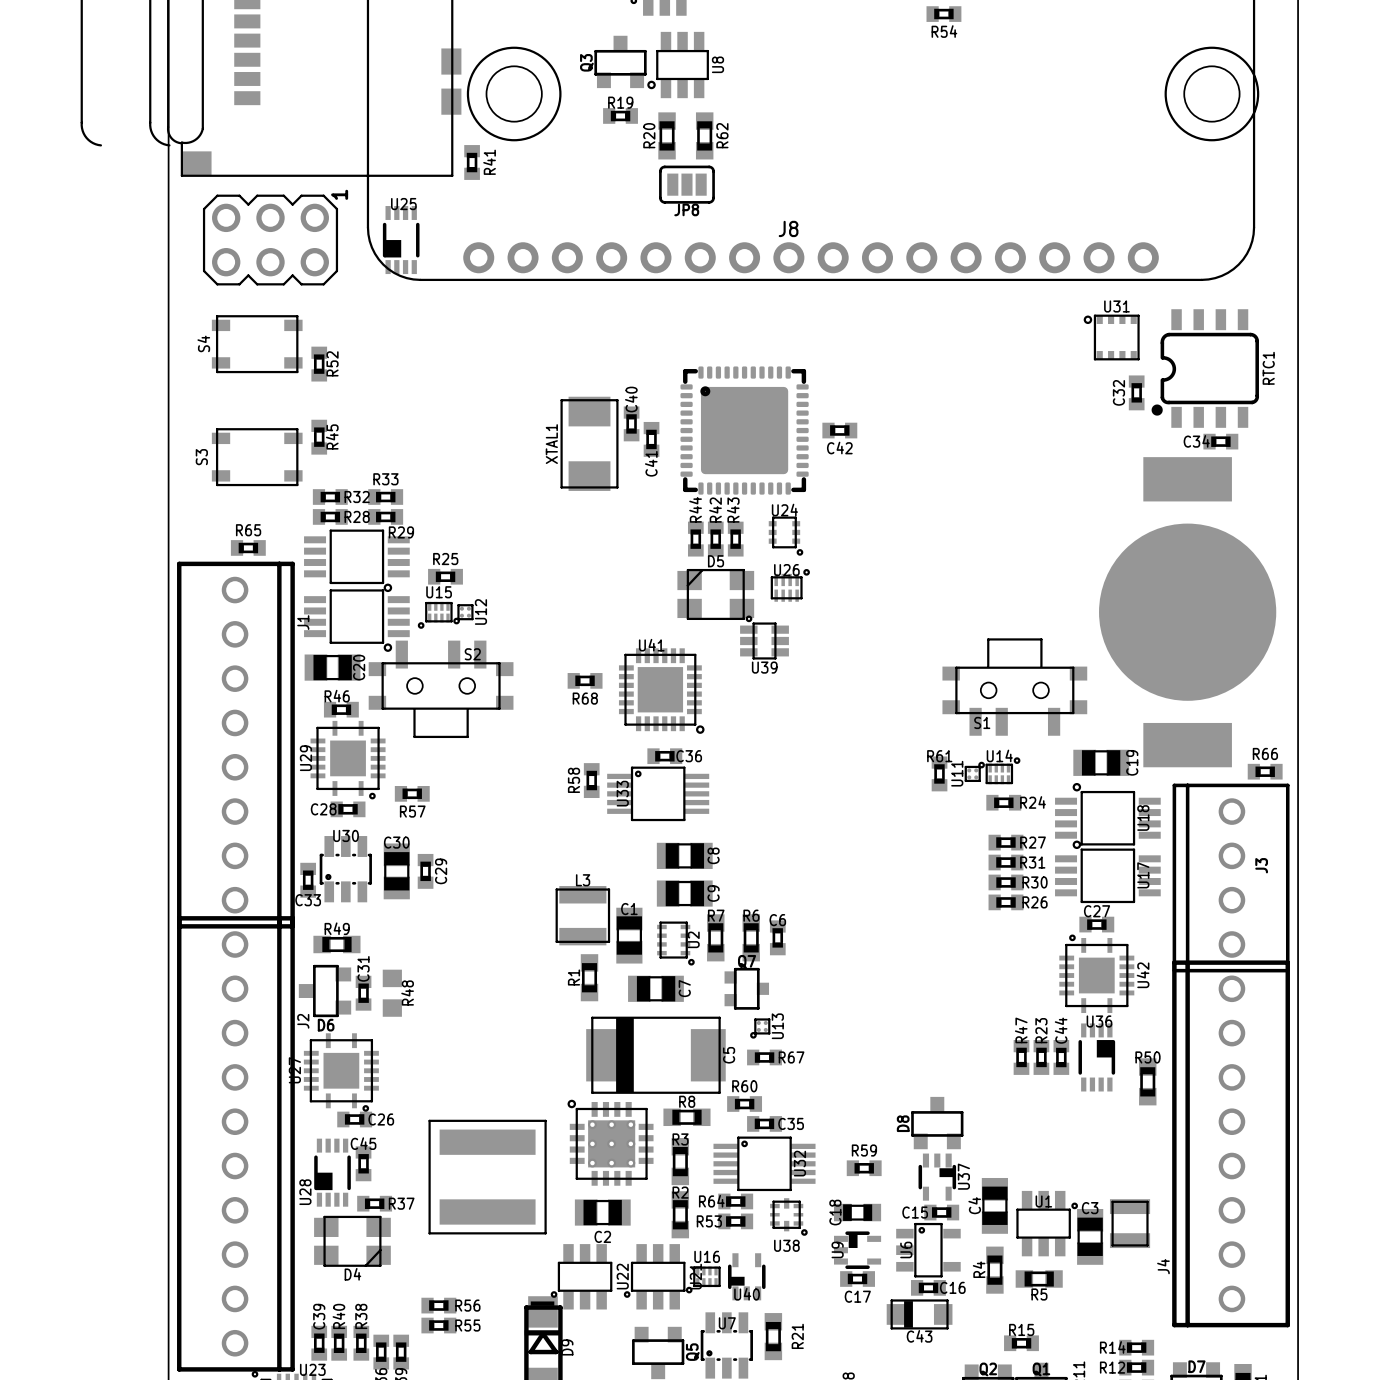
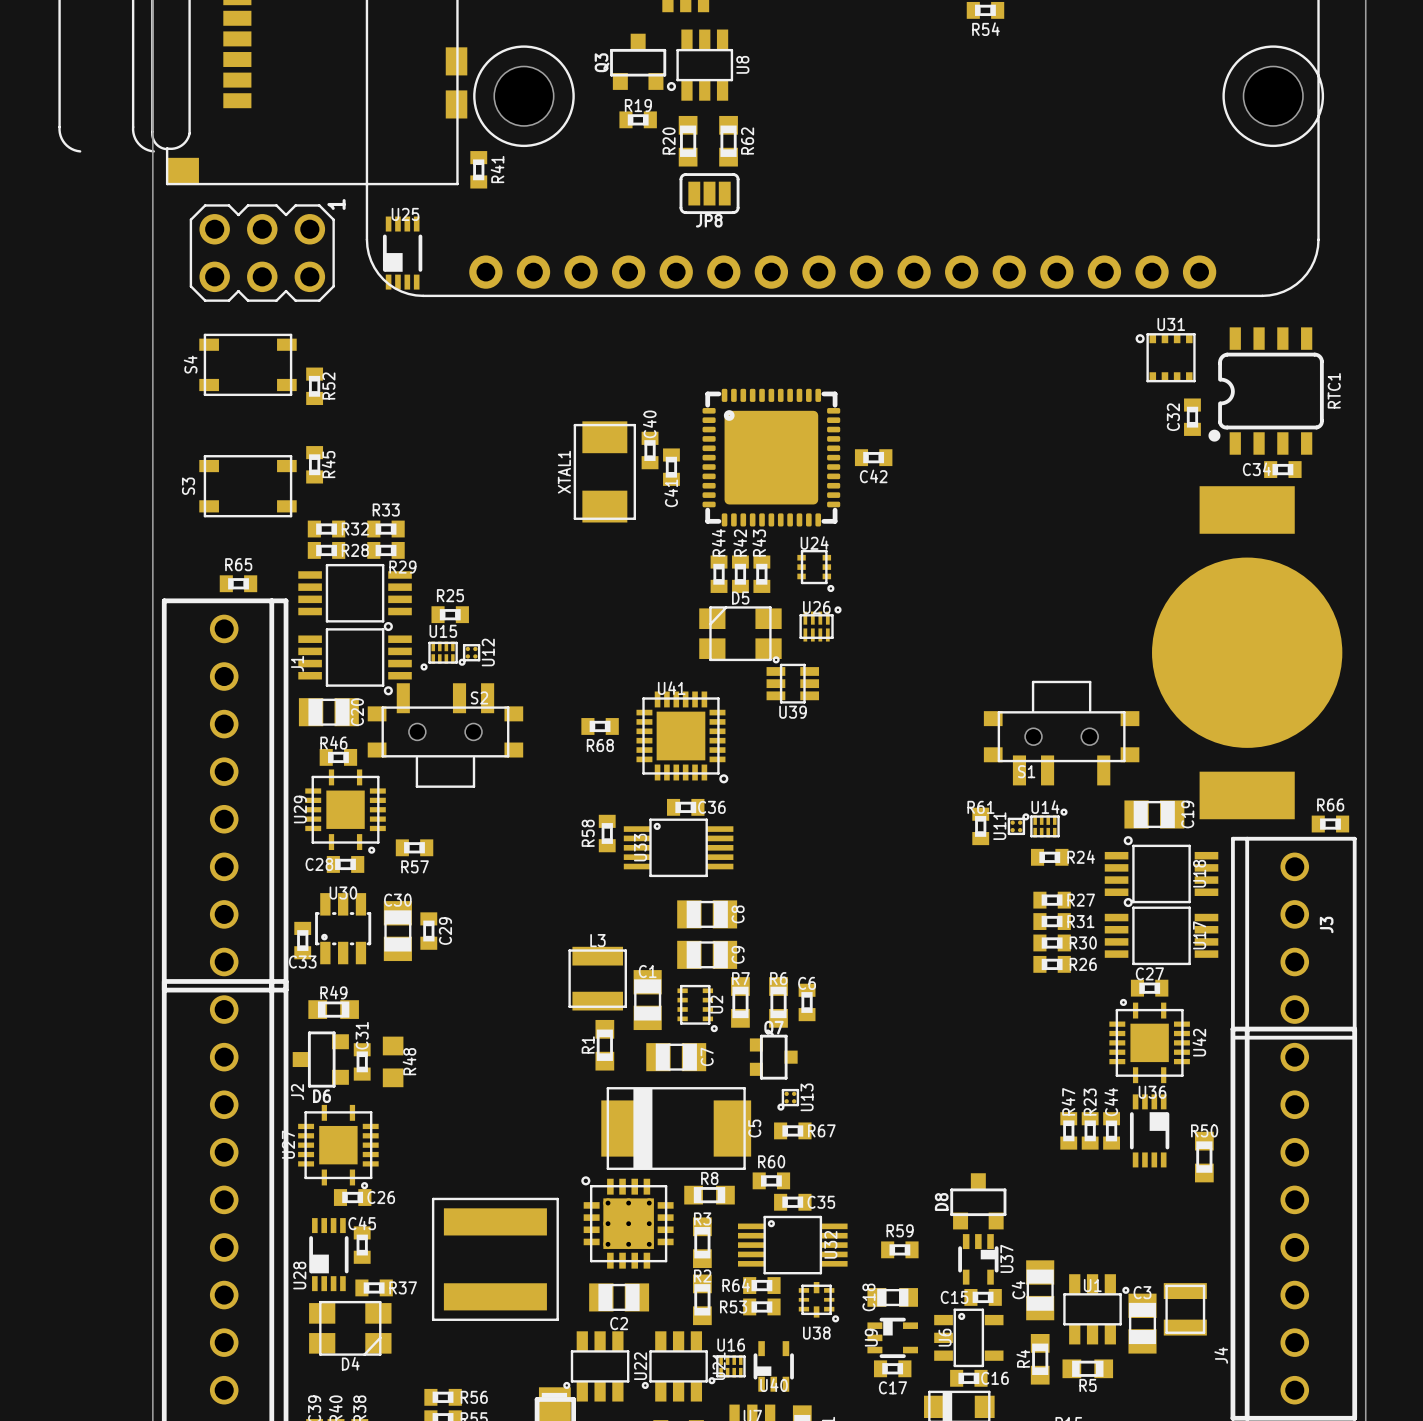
text: J8 (788, 228) -> none

